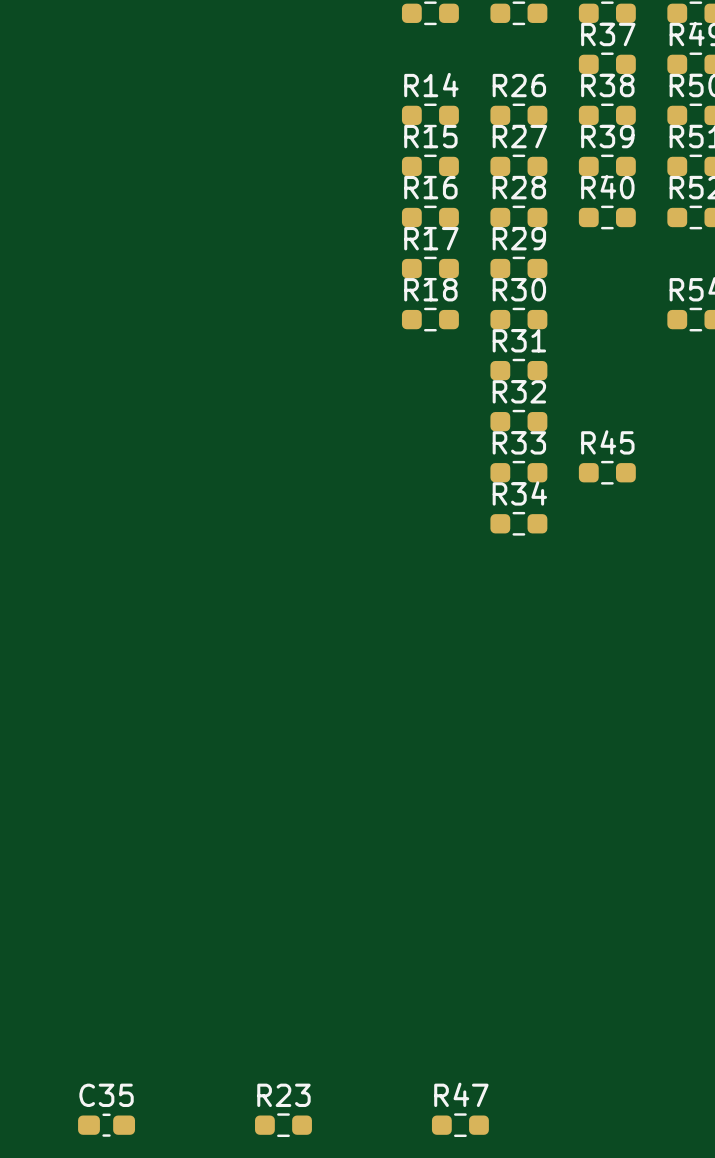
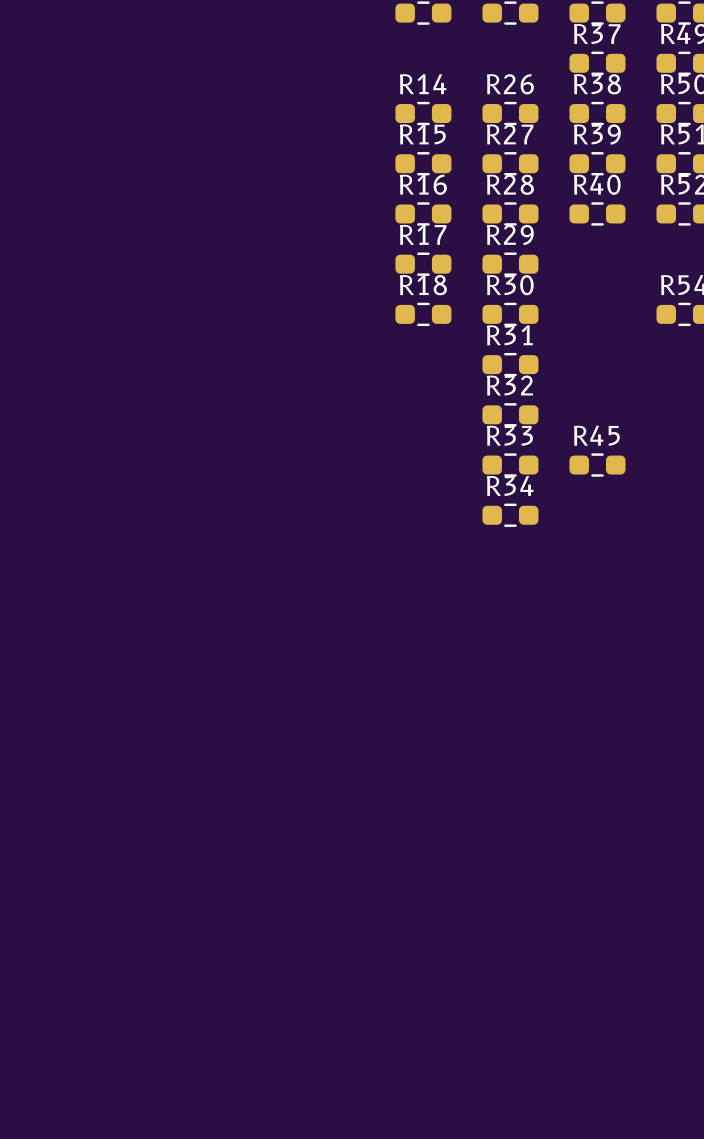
C35: (106, 1125) -> none
R23: (283, 1125) -> none
R47: (460, 1125) -> none

